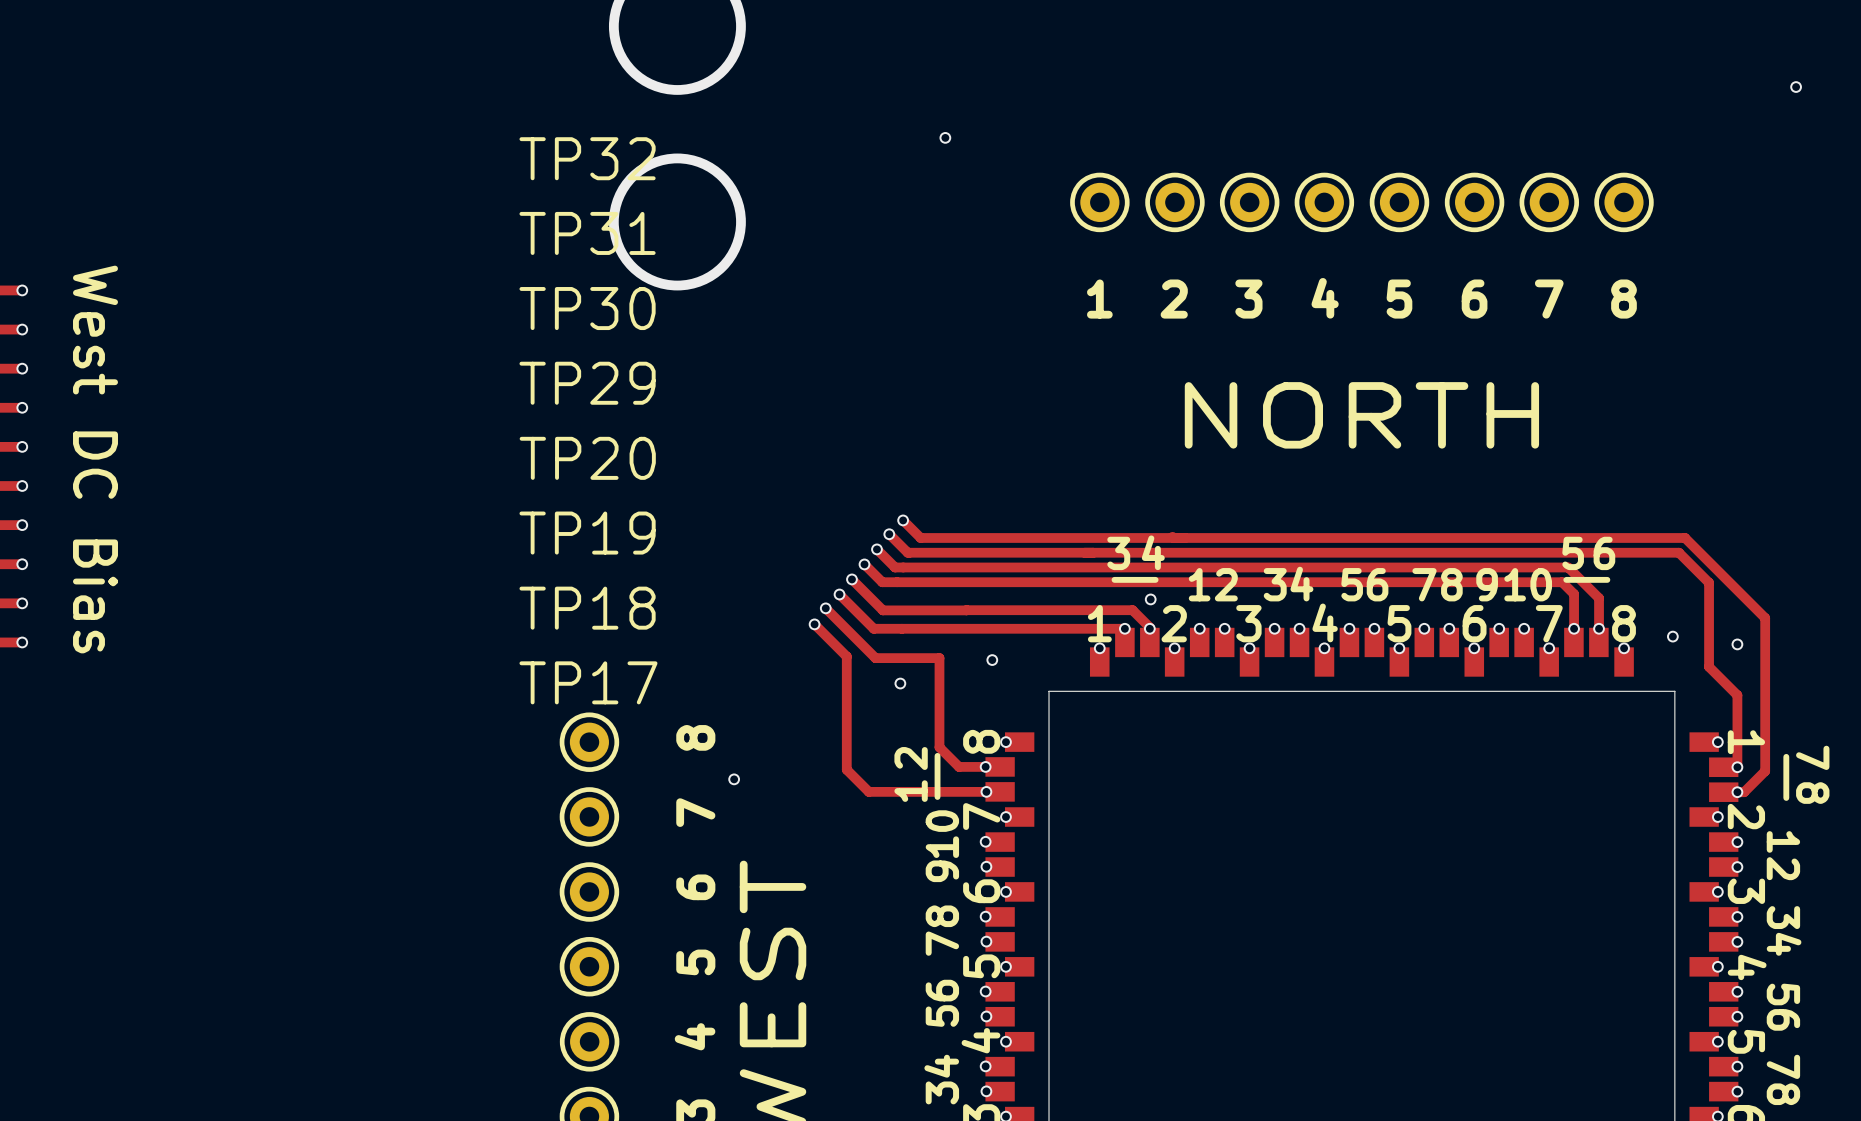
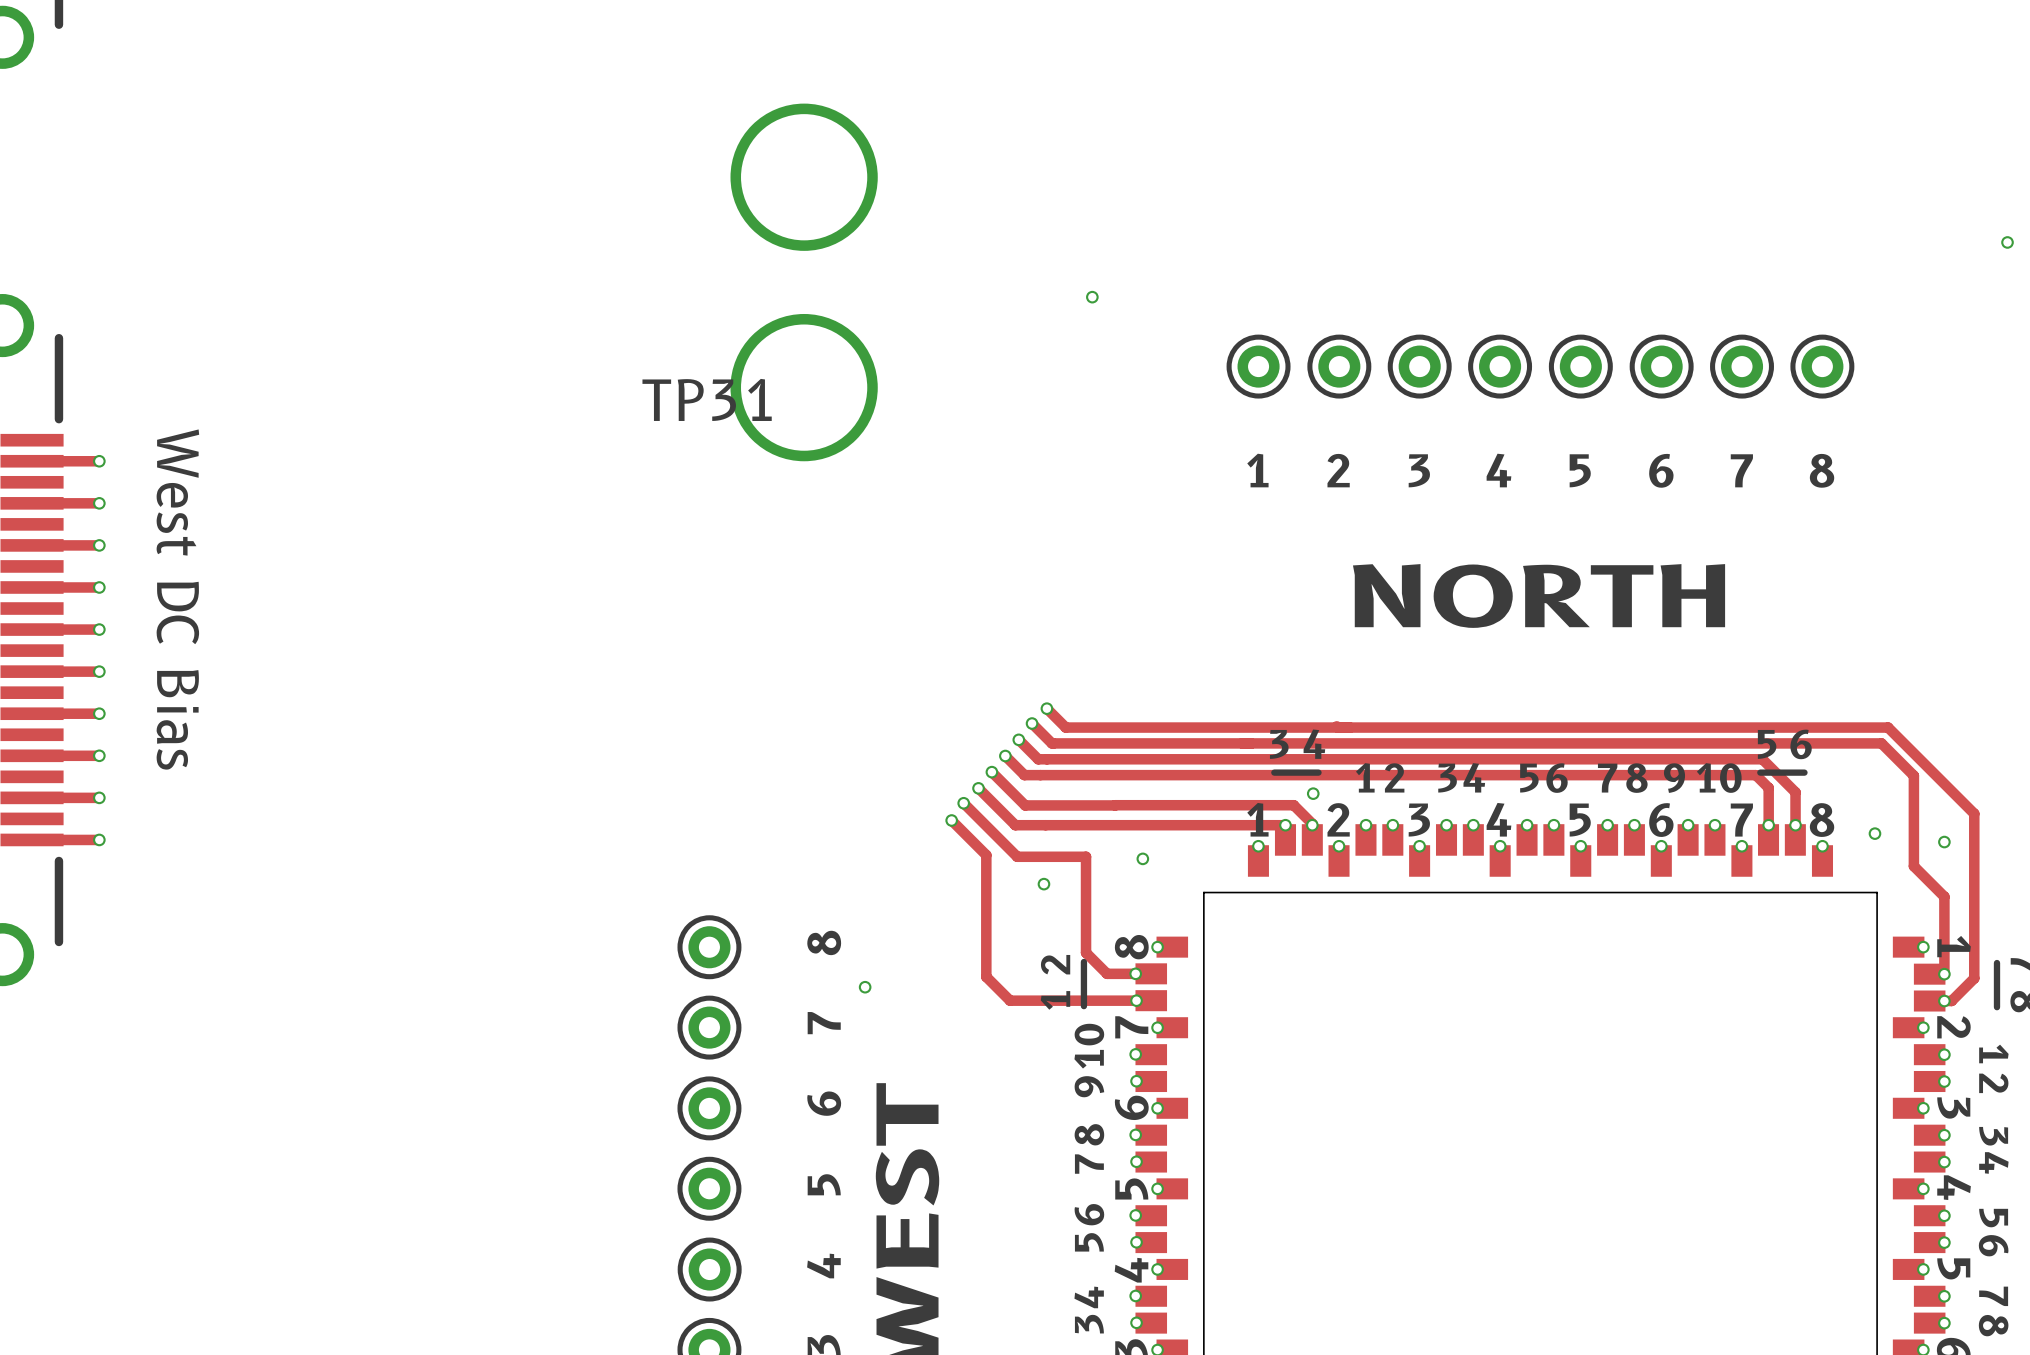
TP32 name: TP32 (587, 158) -> none
TP30 name: TP30 (587, 308) -> none
TP29 name: TP29 (587, 383) -> none
TP20 name: TP20 (587, 458) -> none
TP19 name: TP19 (587, 533) -> none
TP18 name: TP18 (587, 608) -> none
TP17 name: TP17 (588, 682) -> none

